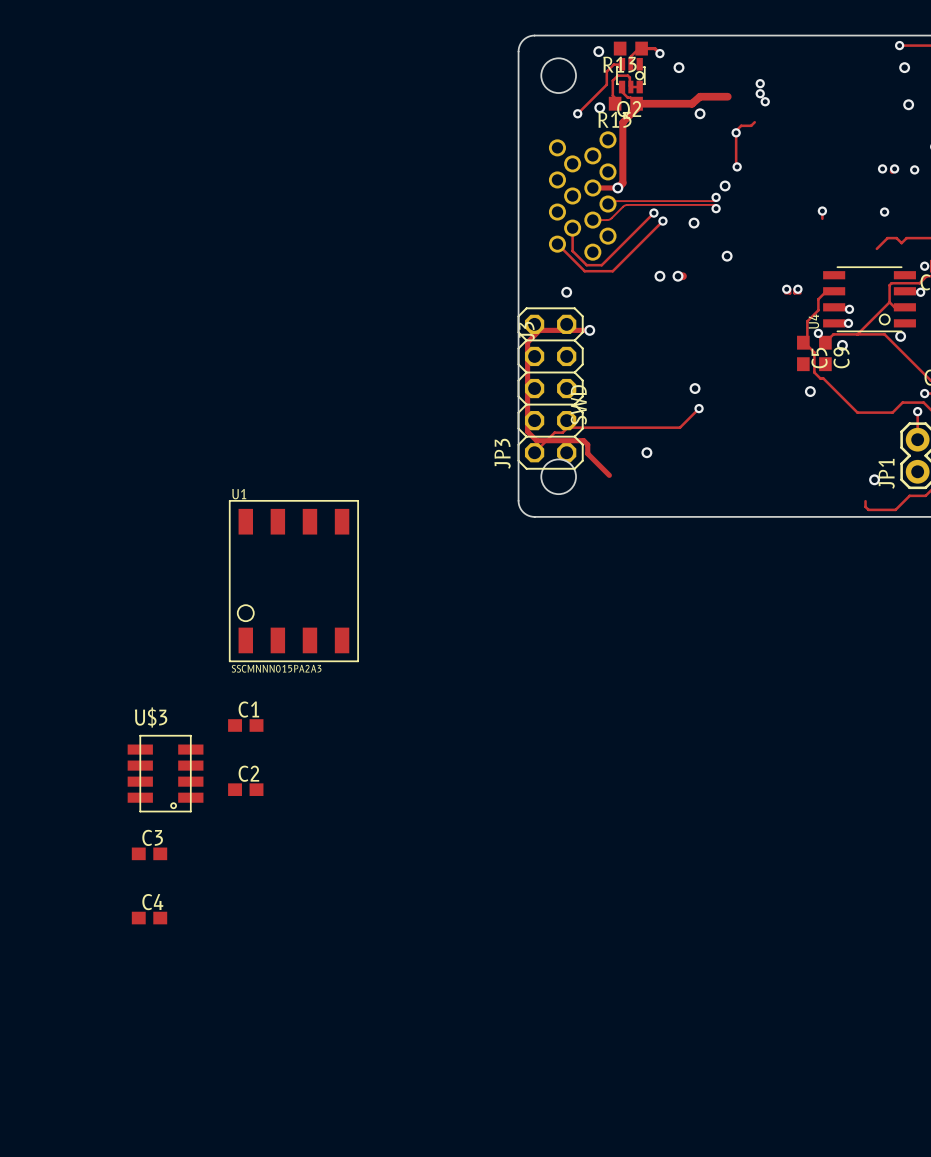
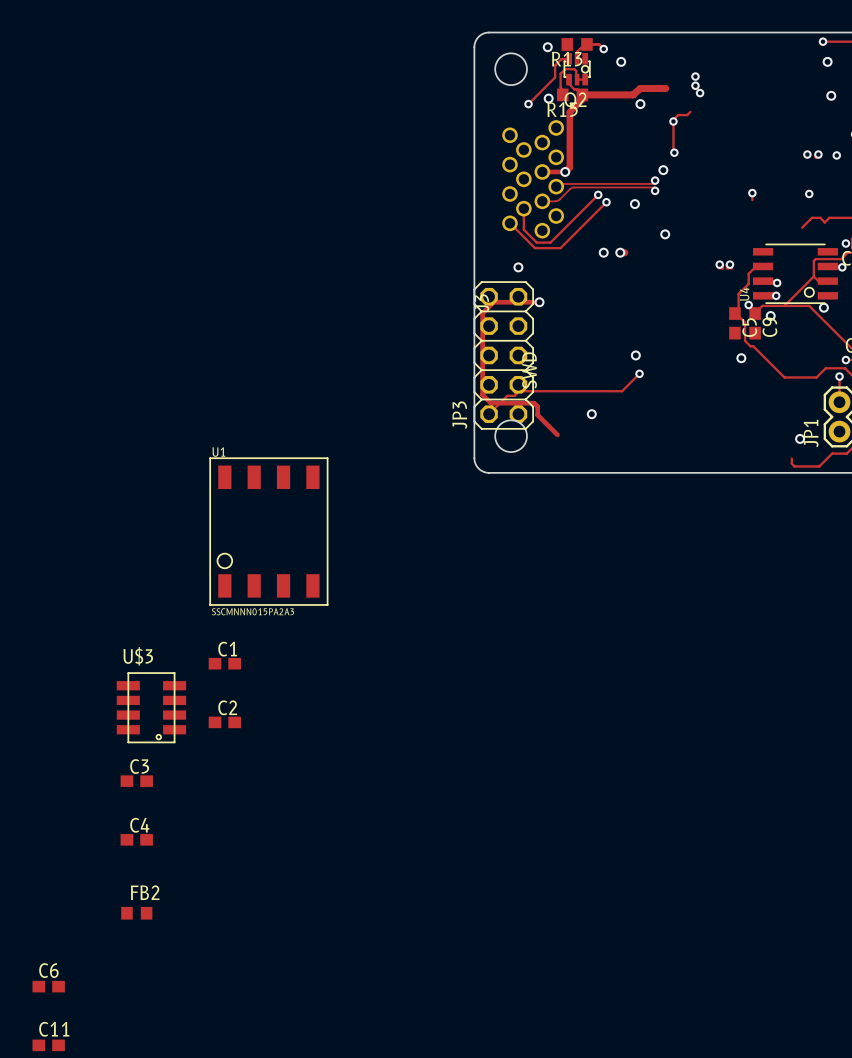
FB2: none -> (136, 913)
C6: none -> (48, 986)
C11: none -> (48, 1045)

